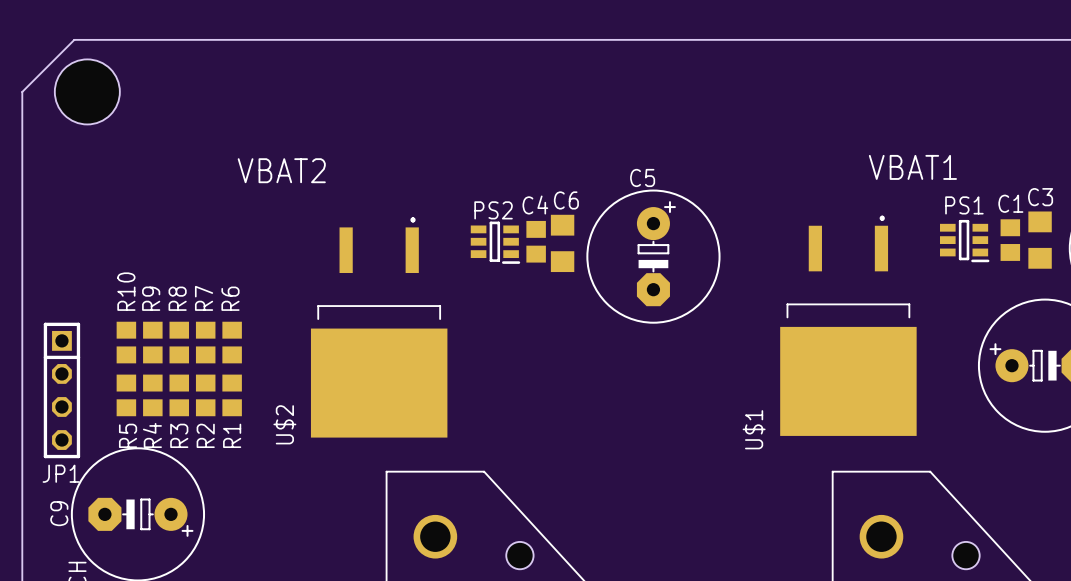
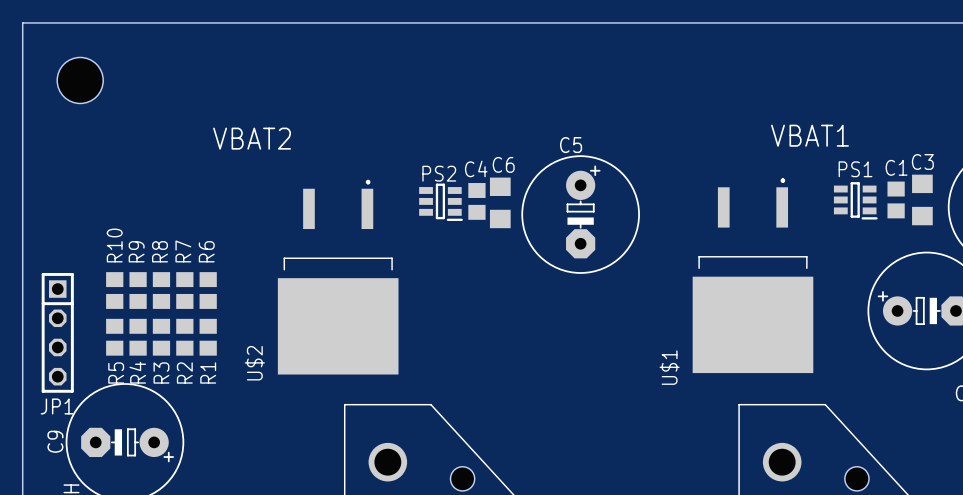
board edge: (74, 39) (22, 91) -> (68, 22) (22, 22) (22, 68)
hole size: [54, 59, 120, 125] -> [57, 57, 104, 104]

